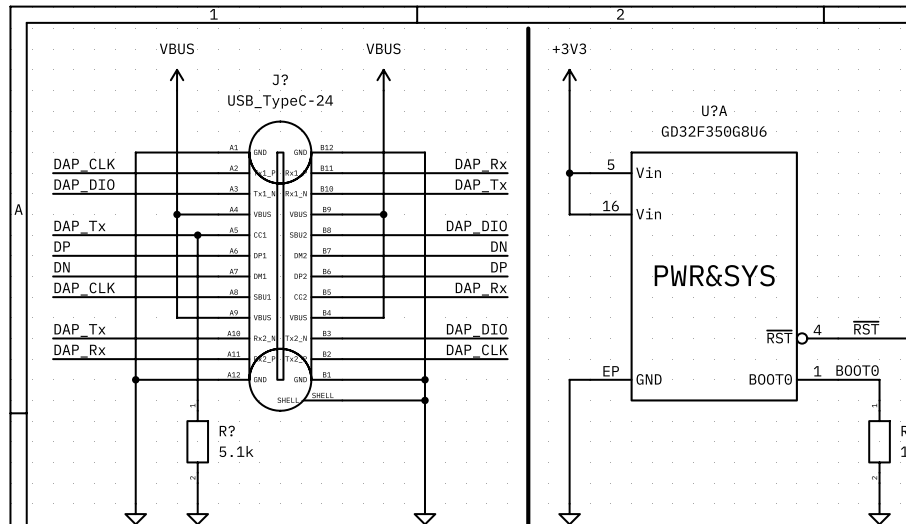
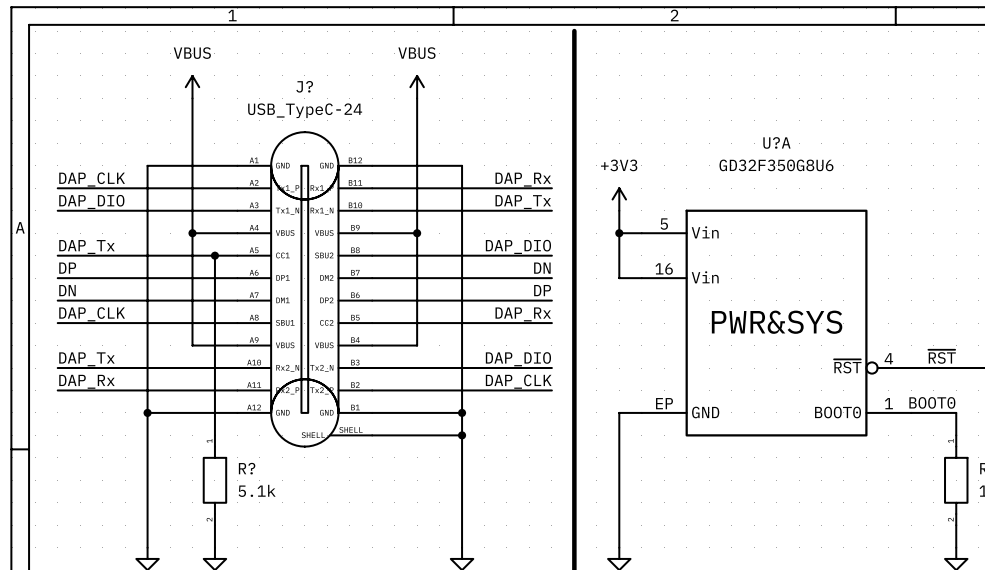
power symbol position: +3V3 (569, 80) -> +3V3 (619, 199)
wire: (569, 90) (569, 193) -> none
wire: (569, 173) (590, 173) -> none
junction position: (569, 173) -> (619, 233)
wire: none -> (619, 233) (619, 278) (641, 278)
U?A: GD32F350G8U6 (714, 276) -> none
U?A: none -> GD32F350G8U6 (776, 323)

